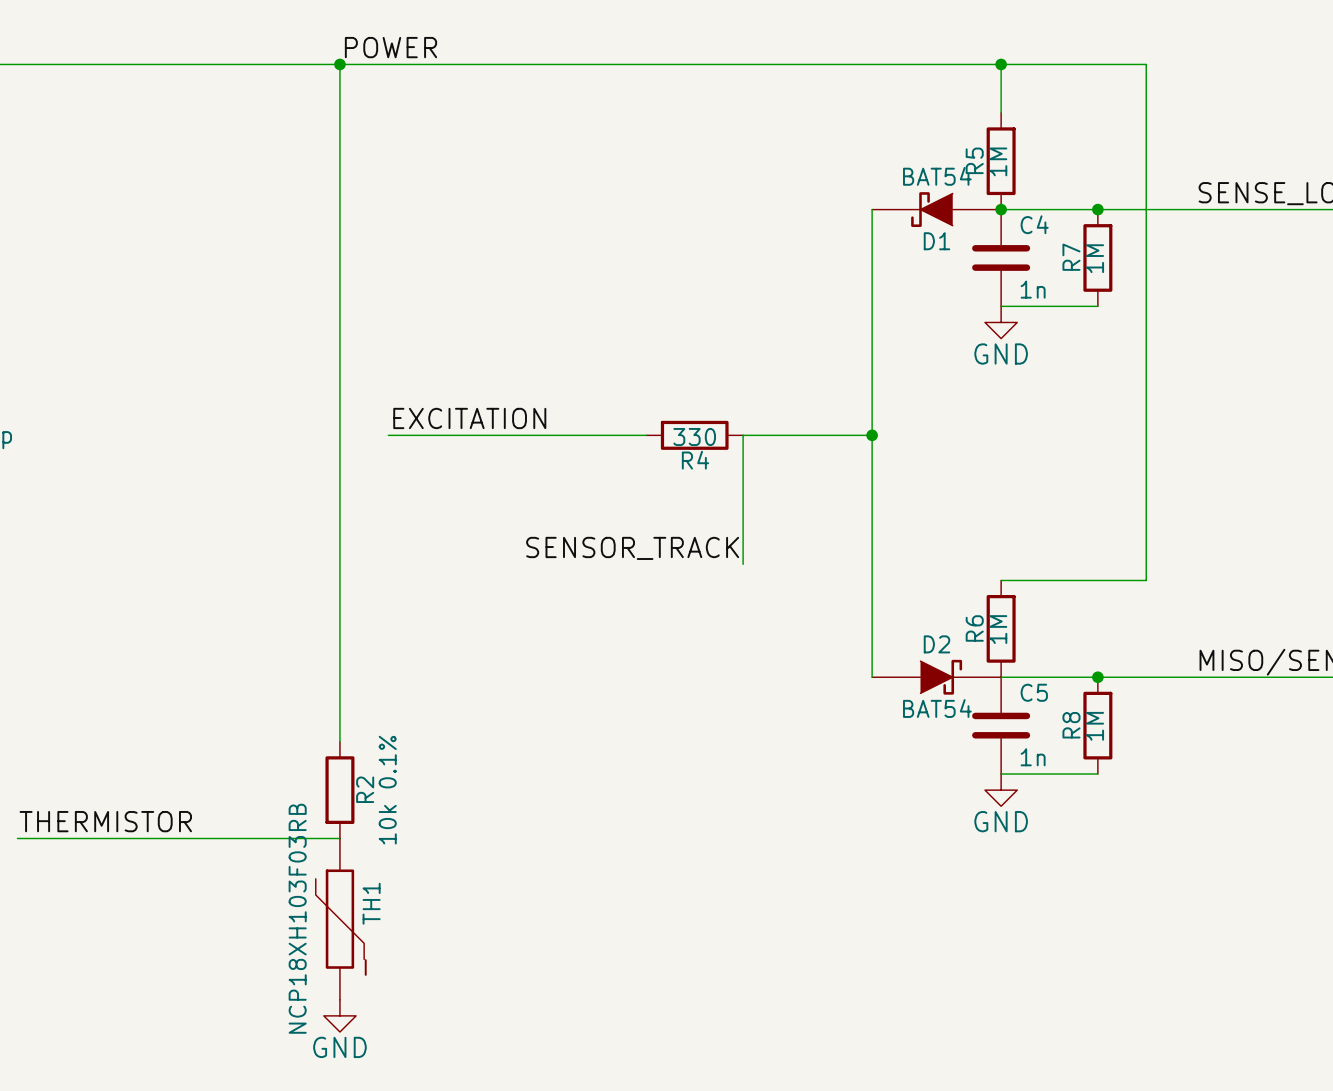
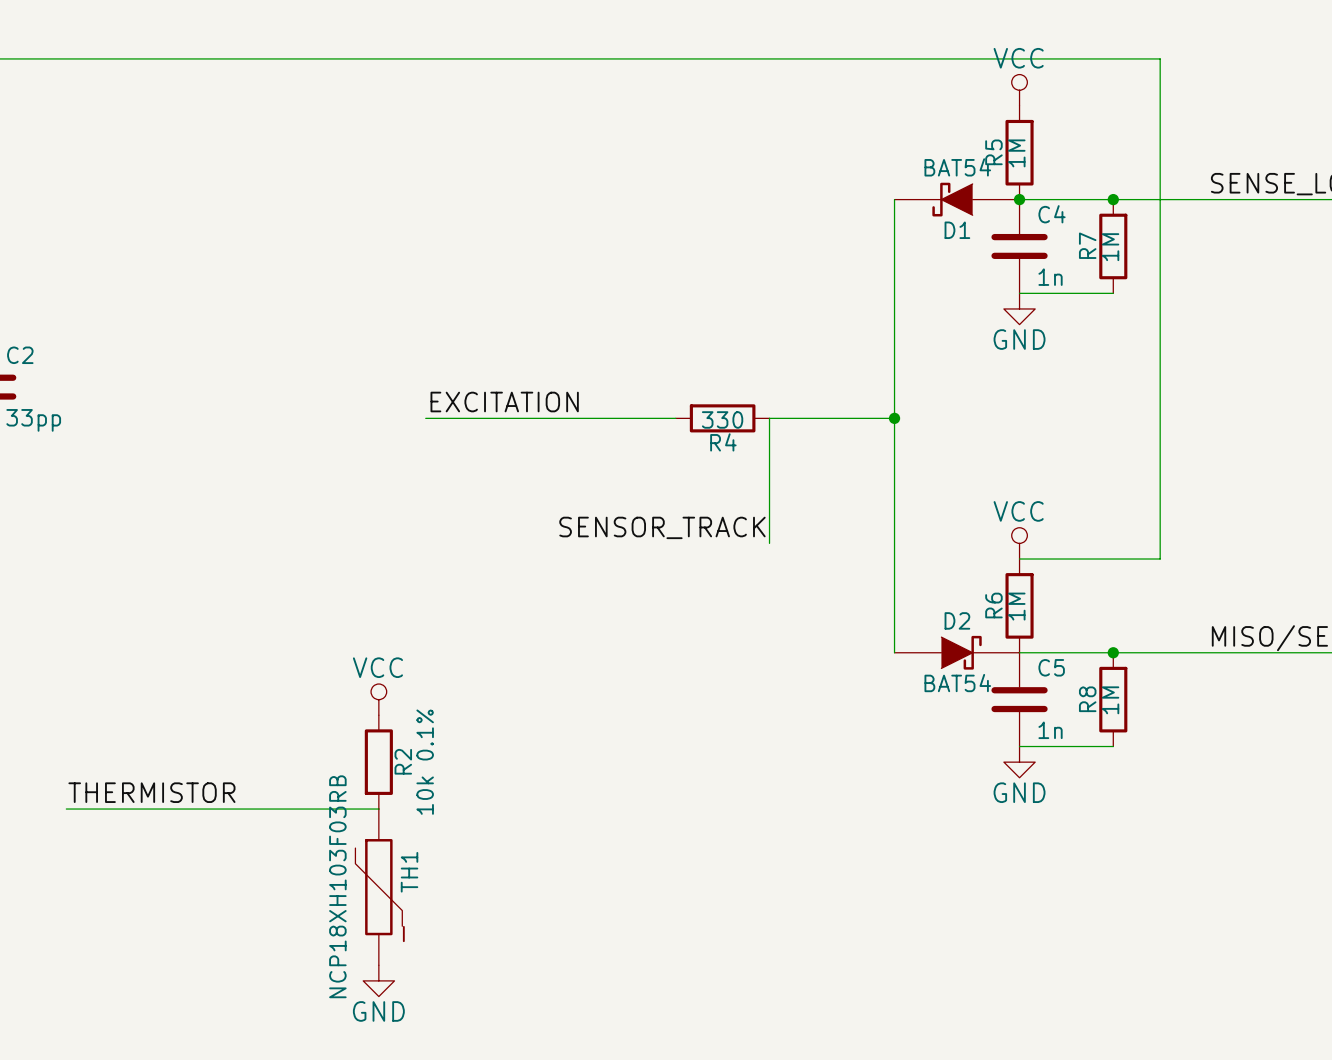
label: POWER (390, 47) -> none
wire: (339, 64) (339, 741) -> none
junction: (339, 64) -> none
wire: (1001, 64) (1001, 112) -> none
junction: (1001, 64) -> none
power symbol: none -> VCC (1019, 90)
power symbol: none -> VCC (1019, 543)
power symbol: none -> VCC (378, 699)

